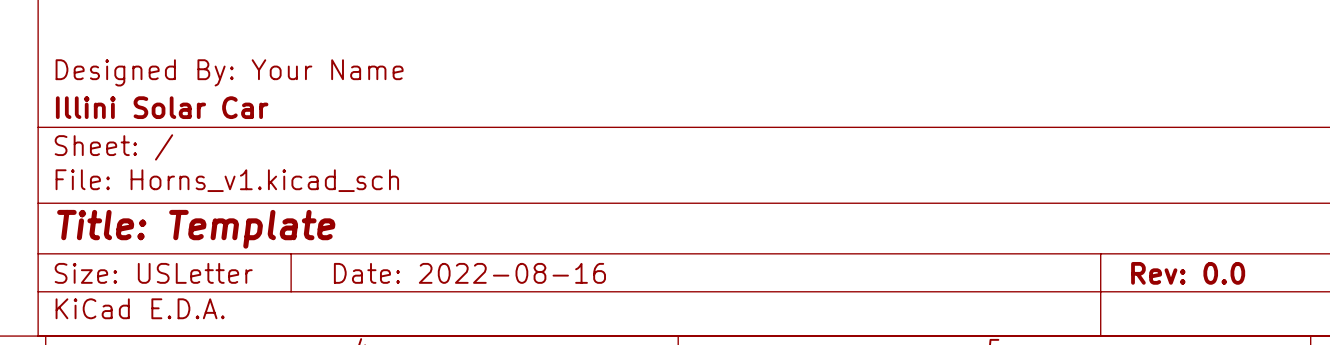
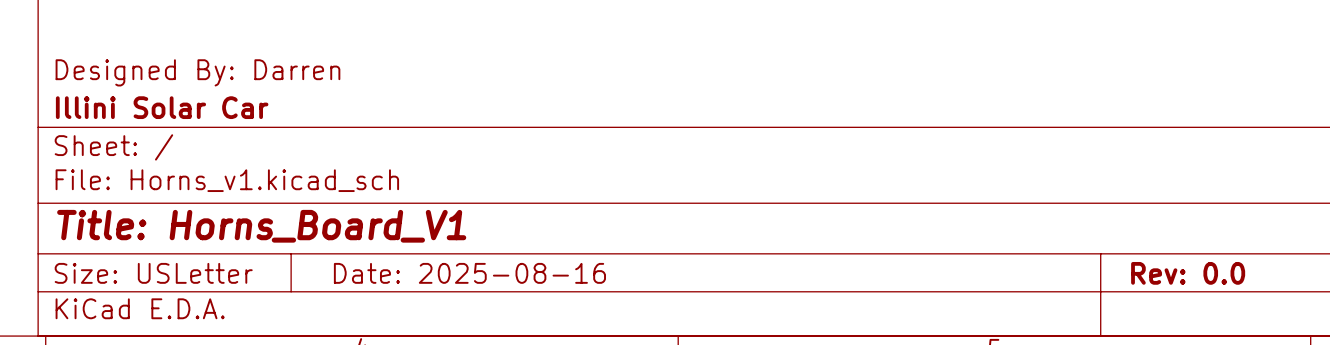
title block: Designed By: Your Name (229, 72) -> Designed By: Darren (197, 72)
title block: Title: Template (196, 229) -> Title: Horns_Board_V1 (261, 226)
title block: Date: 2022-08-16 (469, 273) -> Date: 2025-08-16 (469, 273)

